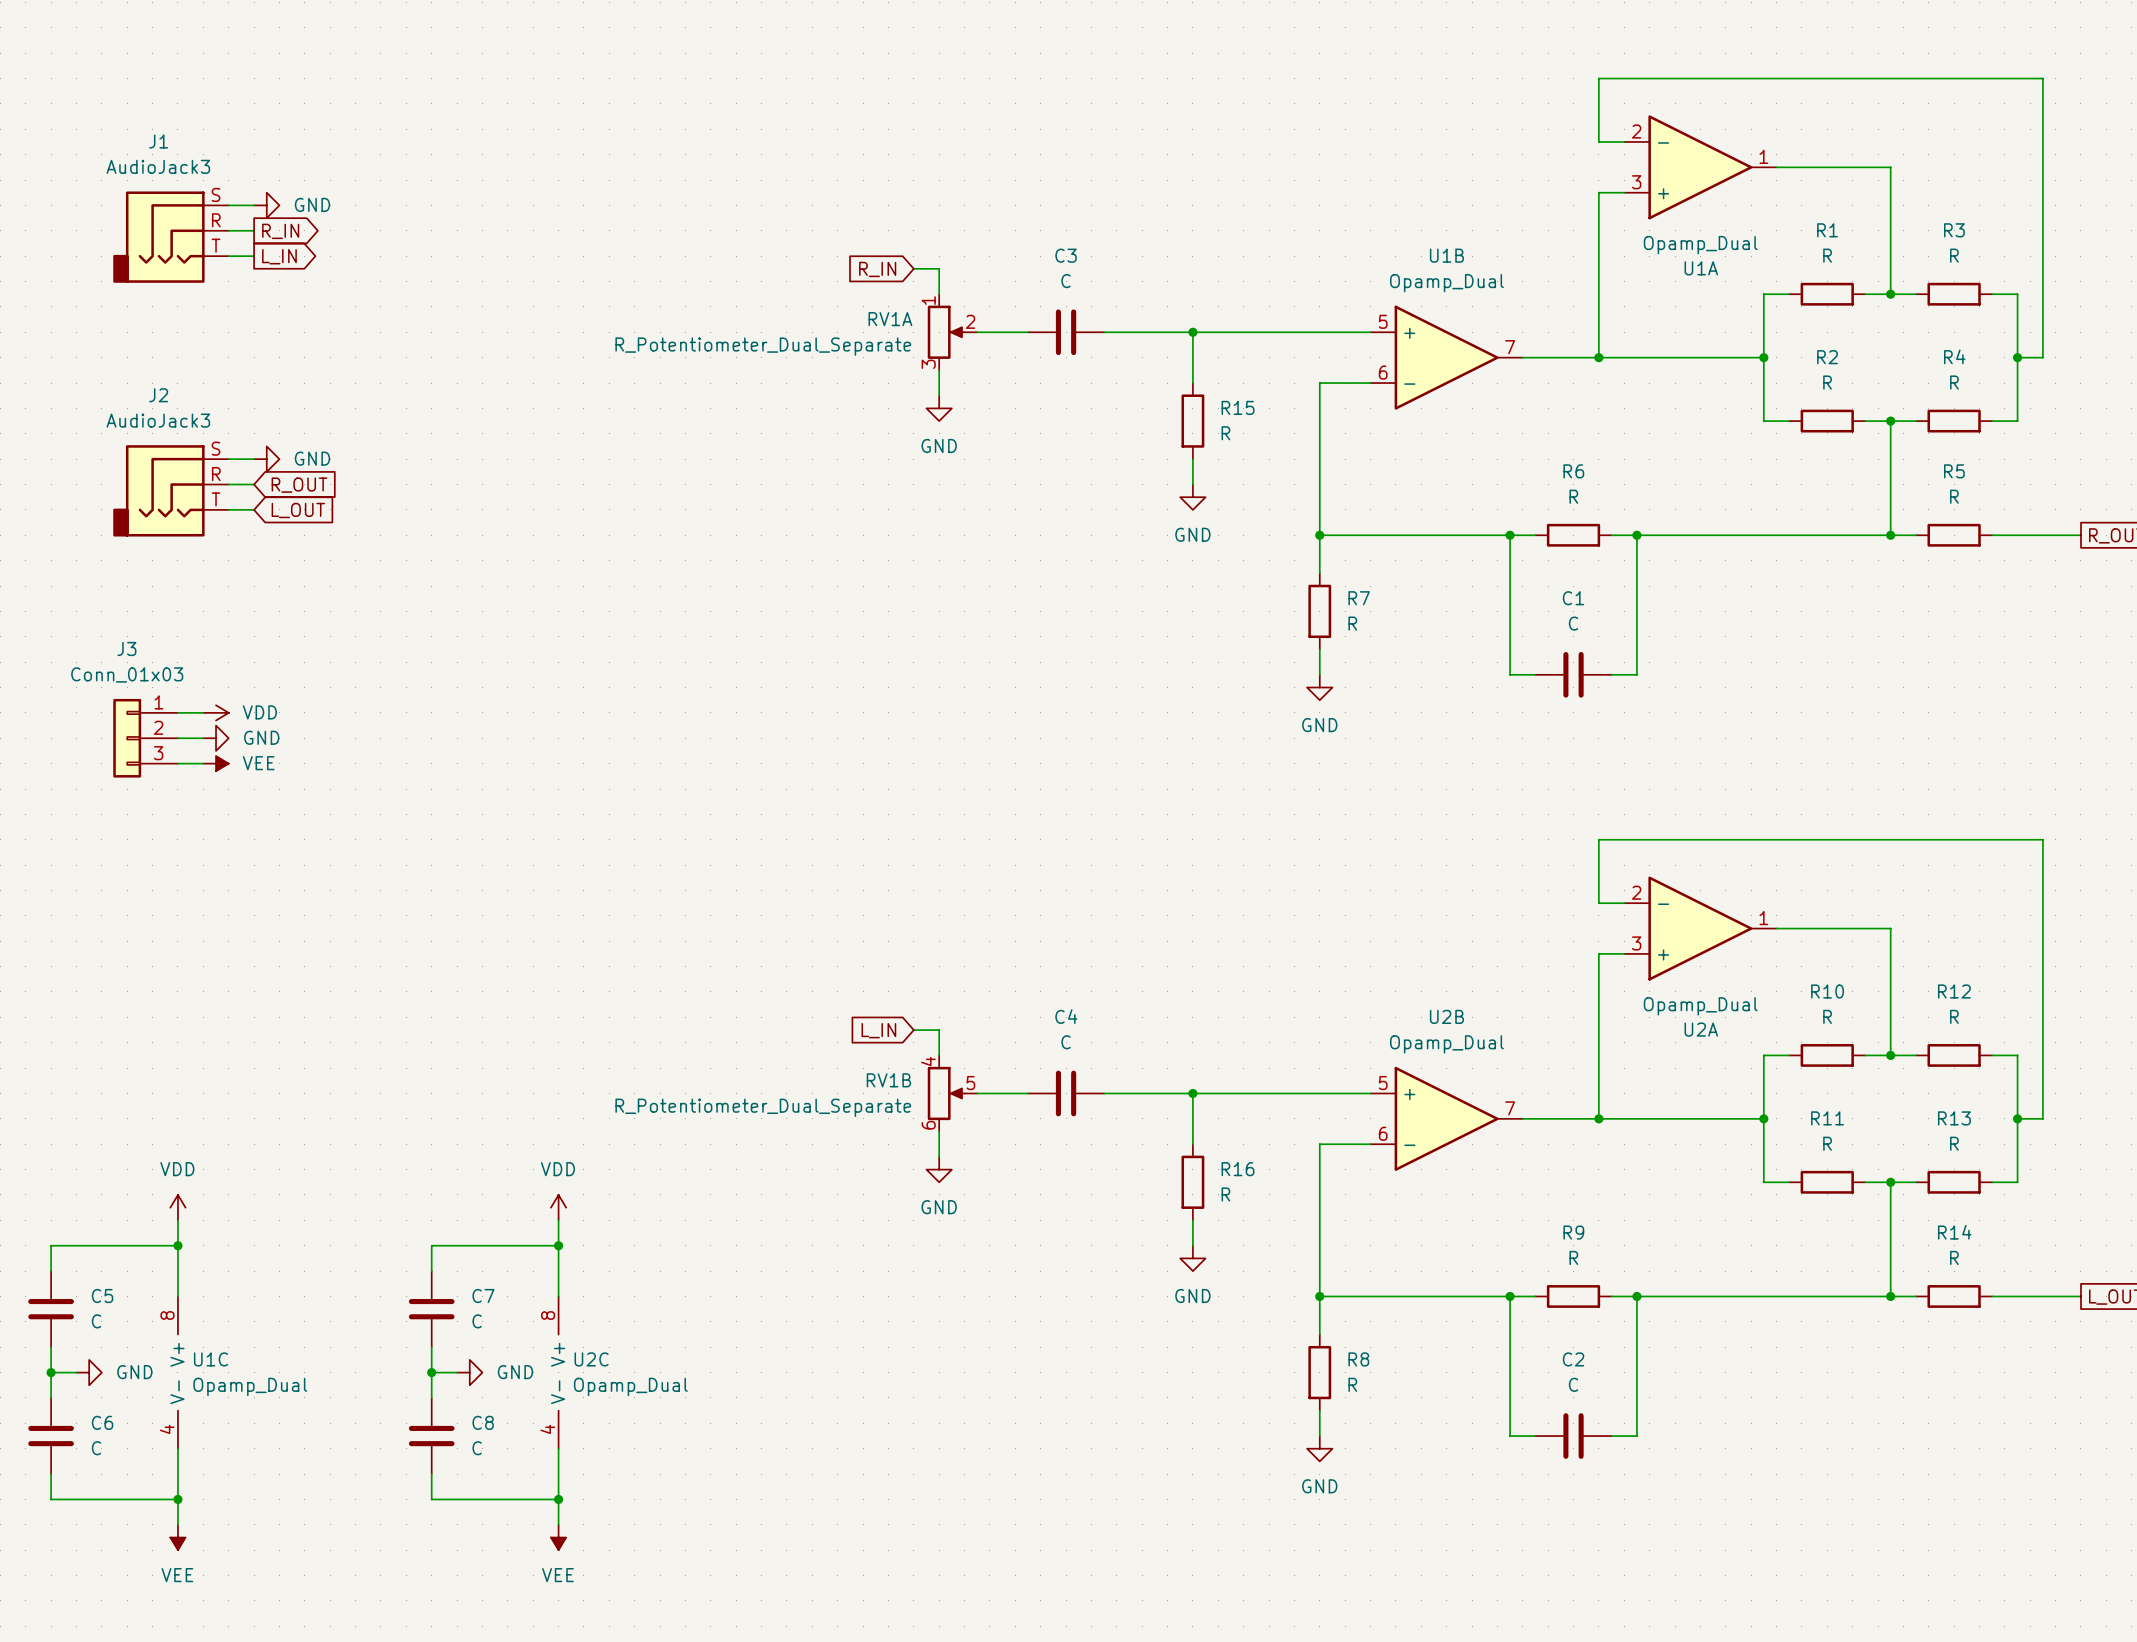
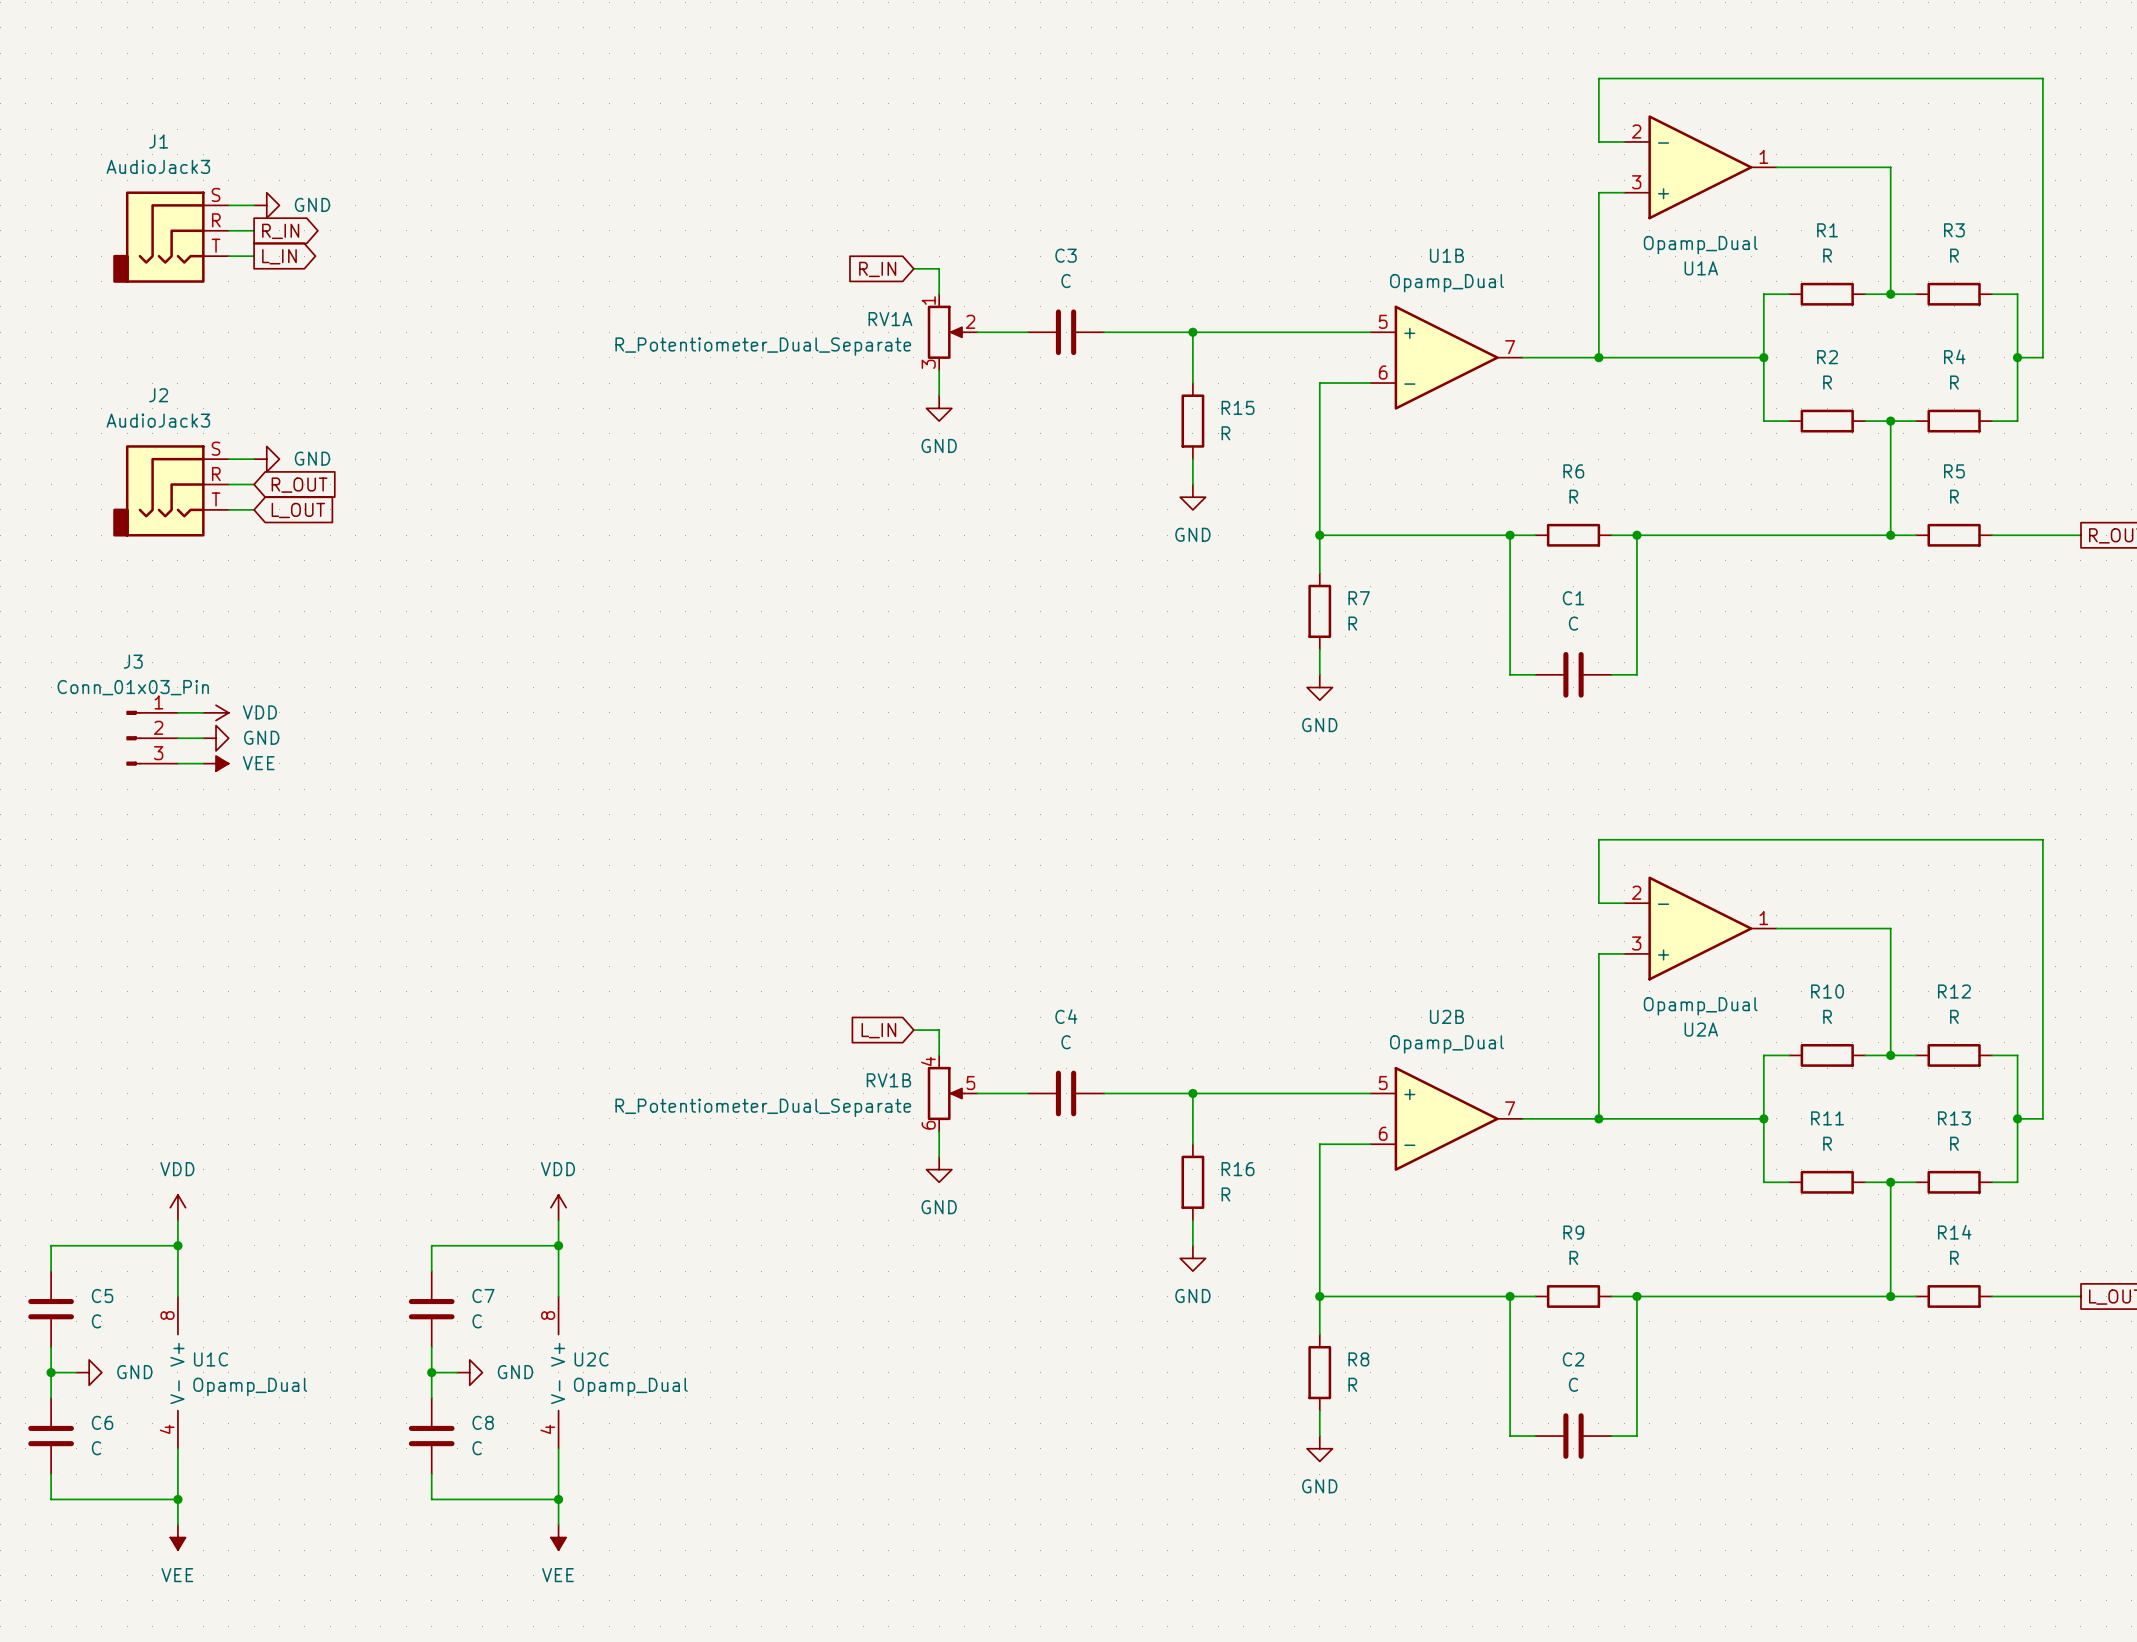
J3 value: Conn_01x03 (127, 674) -> Conn_01x03_Pin (133, 687)
J3 symbol: [113, 698, 178, 778] -> [126, 710, 178, 766]

